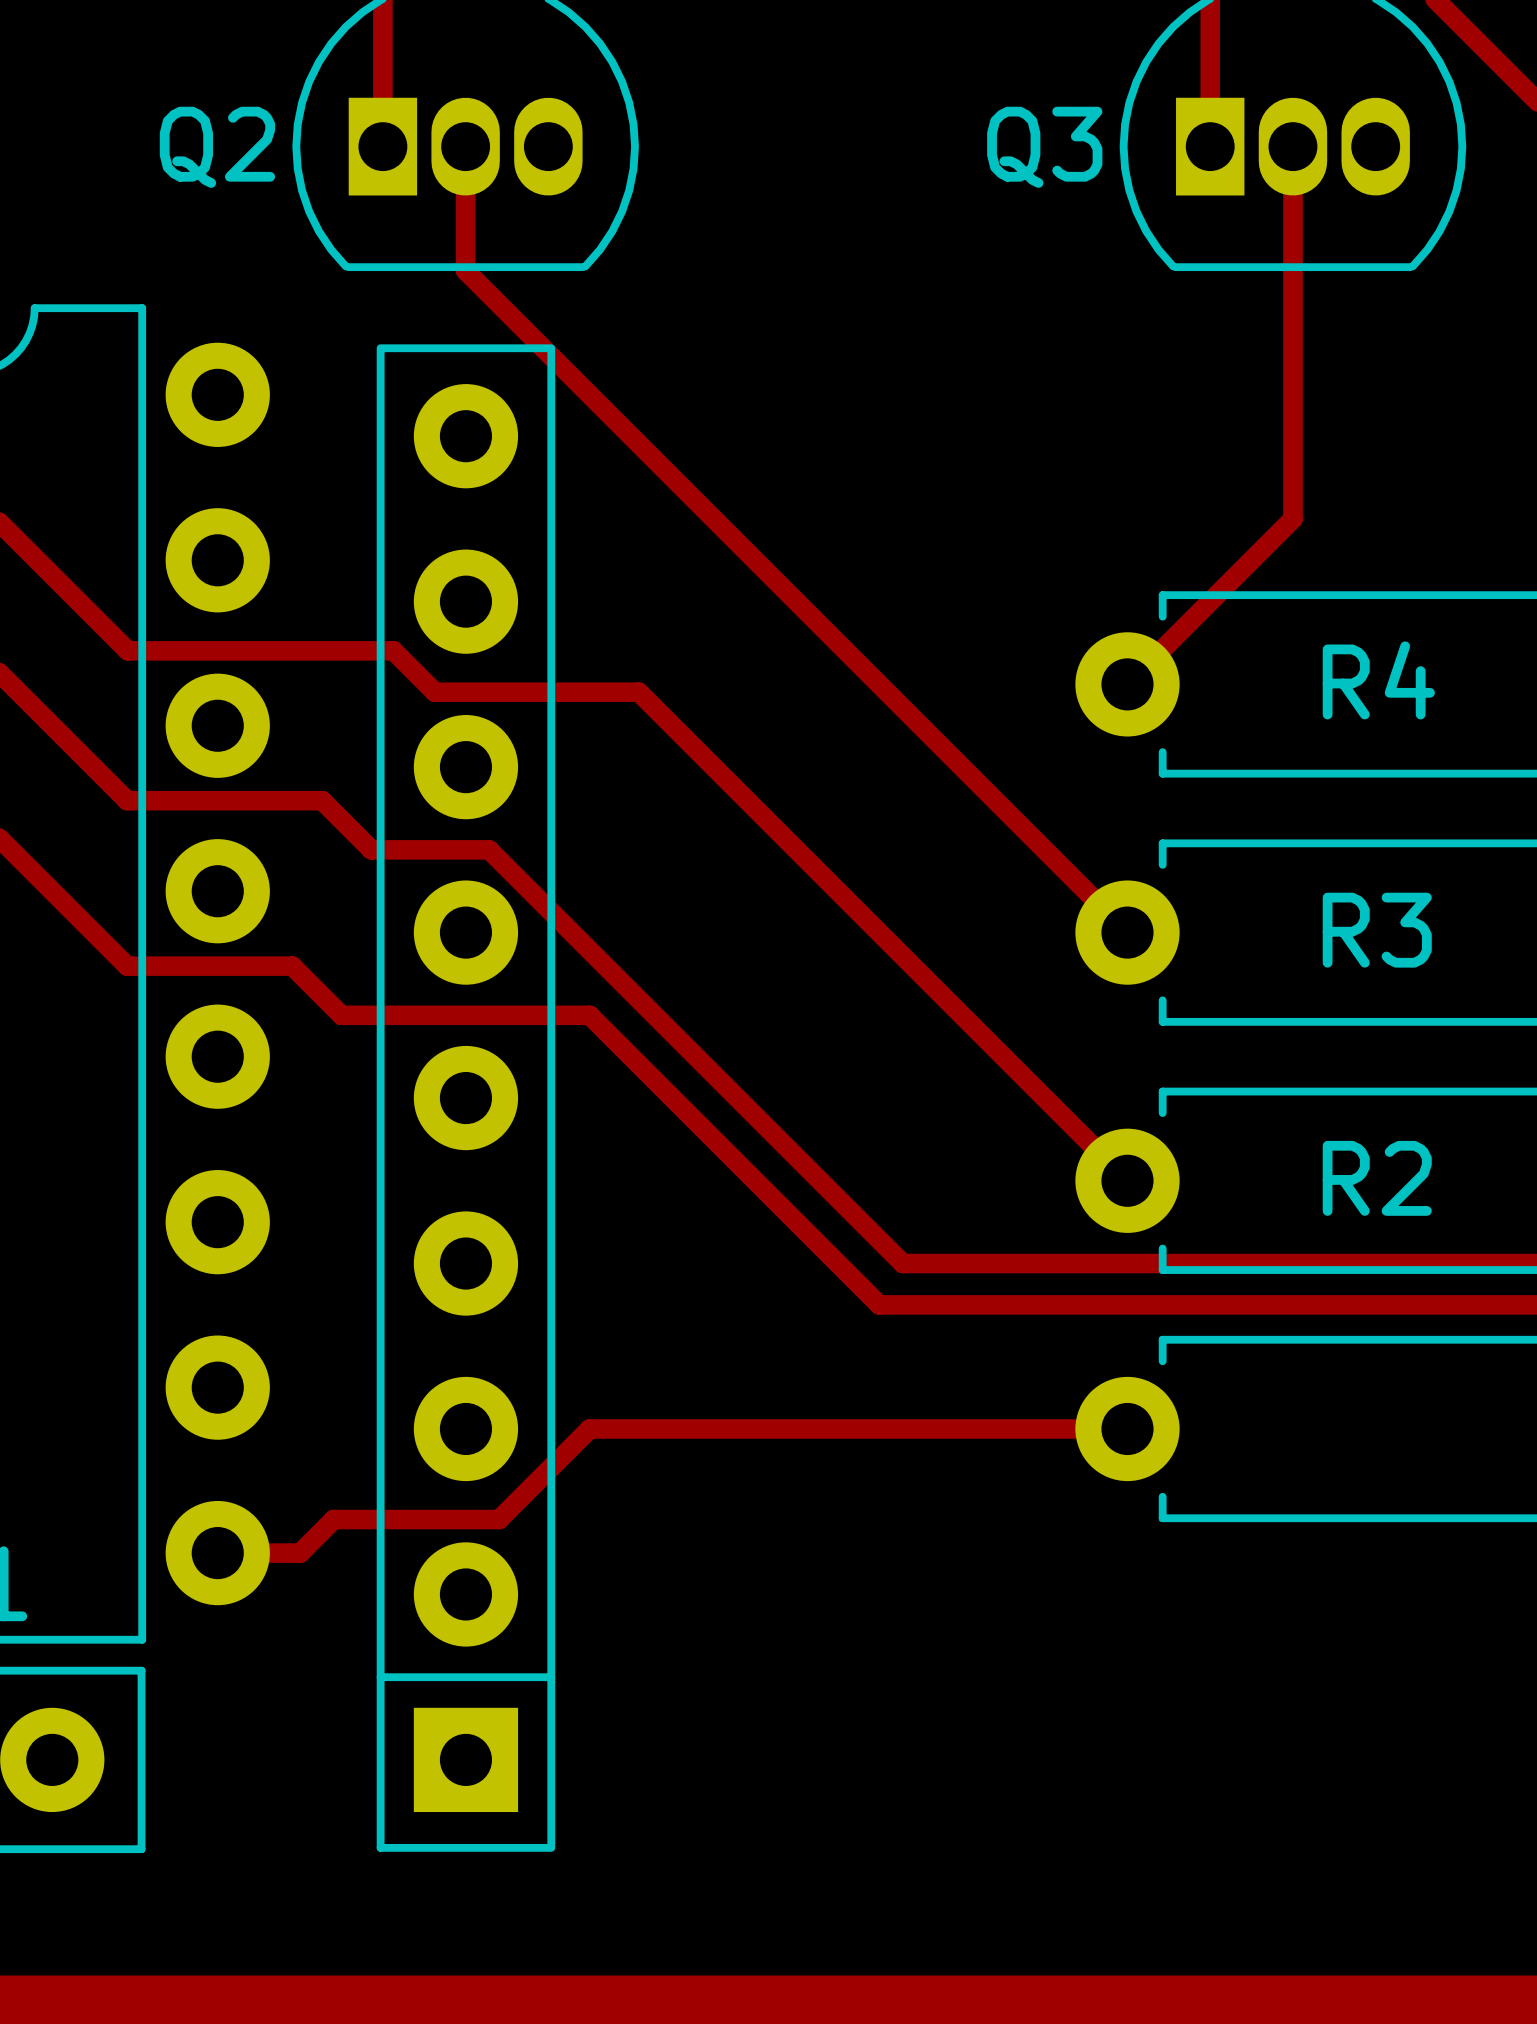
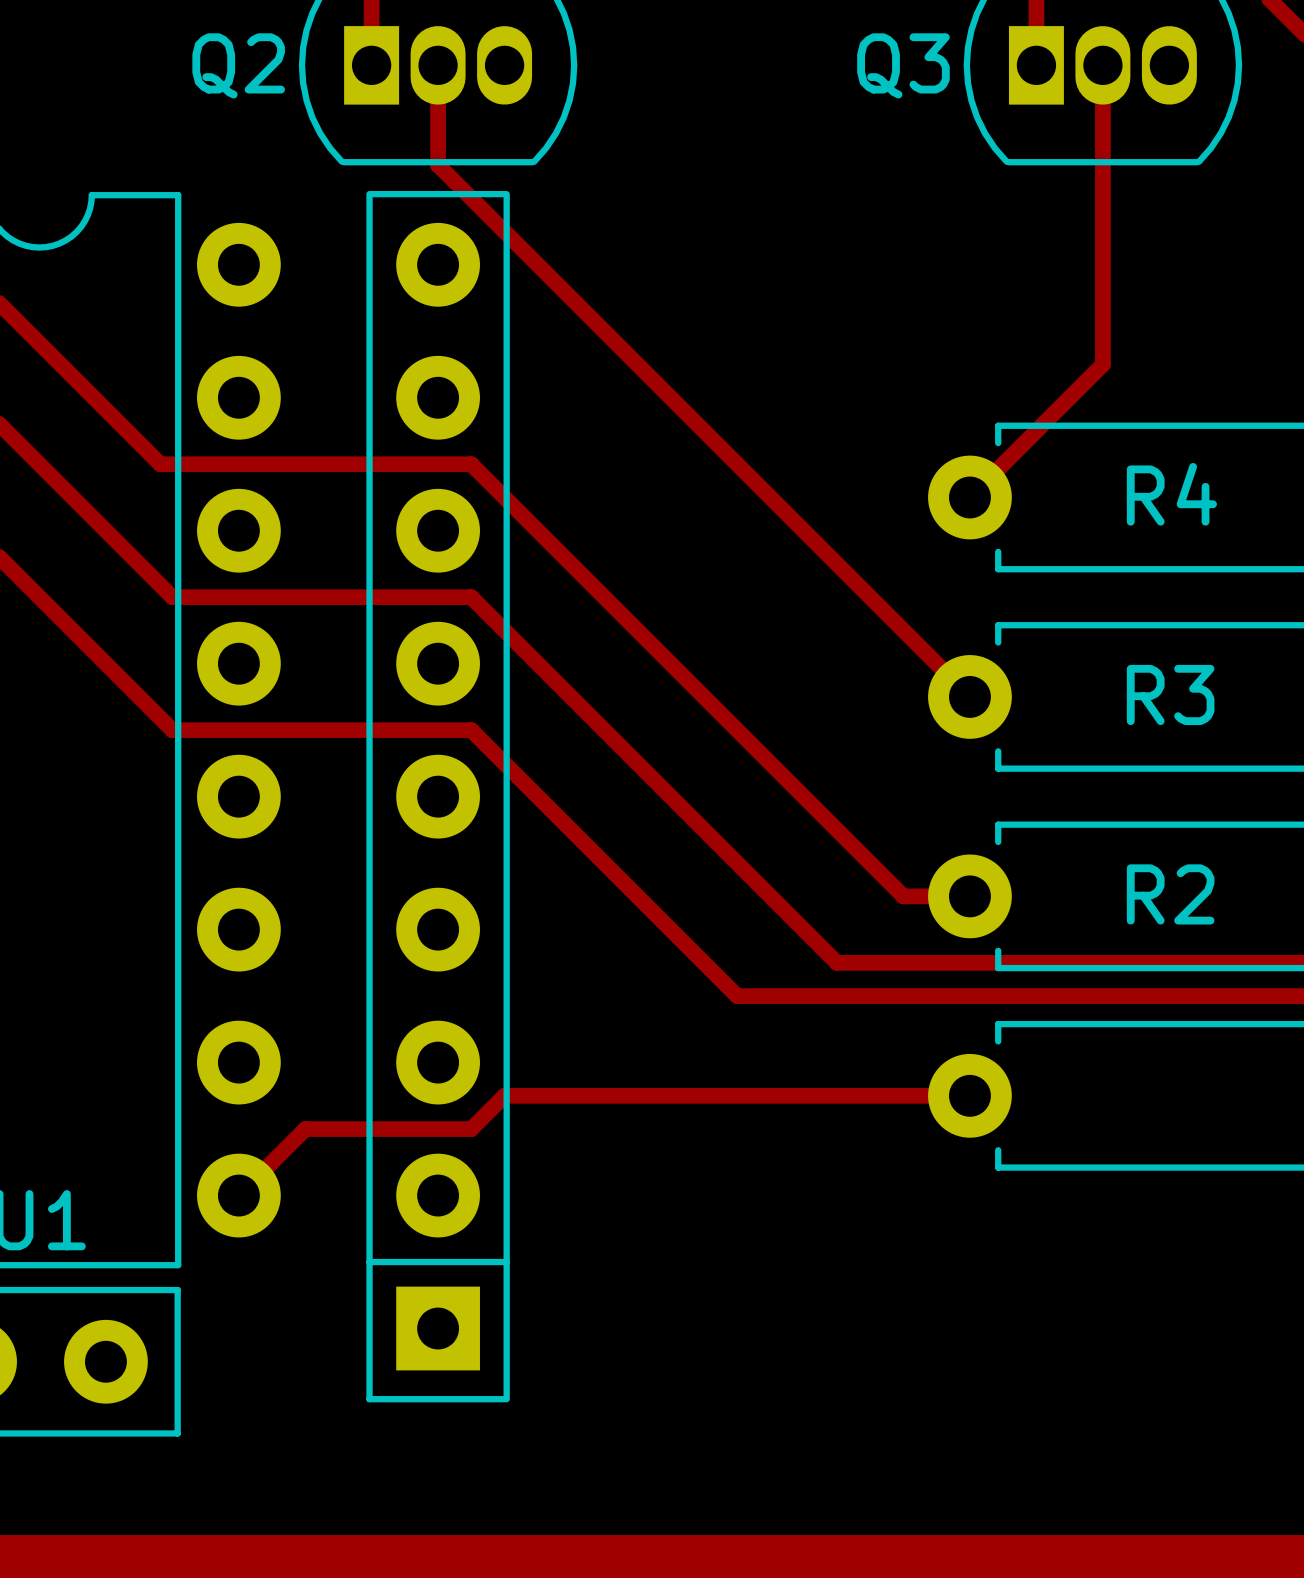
track: (120, 643) (127, 650) (393, 650) (434, 692) (638, 692) (1127, 1180) -> (160, 464) (471, 464) (903, 896) (969, 896)
track: (127, 800) (322, 800) (371, 849) (489, 849) (902, 1263) (962, 1263) -> (166, 590) (172, 597) (471, 597) (836, 962)
track: (127, 966) (292, 966) (341, 1015) (589, 1015) (879, 1304) -> (166, 723) (172, 730) (471, 730) (737, 996) (770, 996)
part position: (465, 1098) -> (438, 796)
track: (589, 1428) (499, 1519) (333, 1519) (300, 1553) (259, 1553) -> (537, 1095) (504, 1095) (471, 1129) (305, 1129) (238, 1195)

